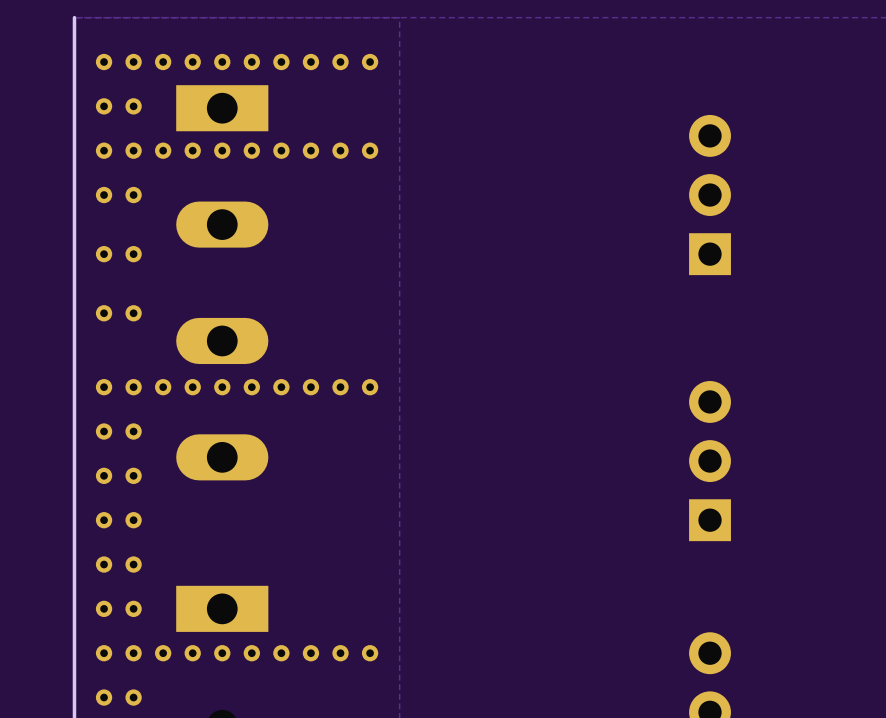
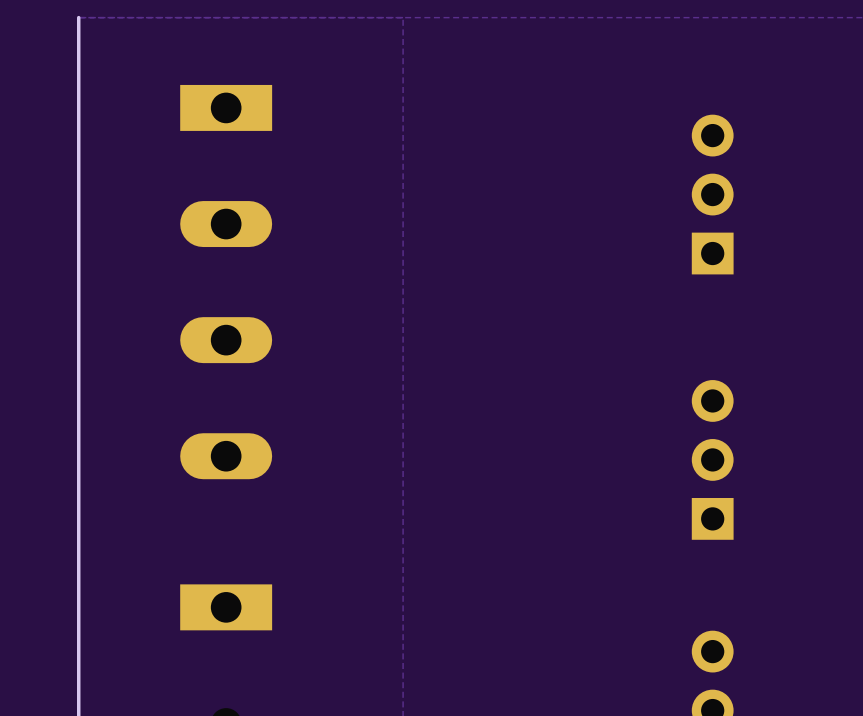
part: (104, 62) -> none
part: (133, 62) -> none
part: (163, 62) -> none
part: (192, 62) -> none
part: (222, 62) -> none
part: (251, 62) -> none
part: (281, 62) -> none
part: (310, 62) -> none
part: (340, 62) -> none
part: (370, 62) -> none
part: (104, 106) -> none
part: (133, 106) -> none
part: (104, 150) -> none
part: (133, 150) -> none
part: (163, 150) -> none
part: (192, 150) -> none
part: (222, 150) -> none
part: (251, 150) -> none
part: (281, 150) -> none
part: (310, 150) -> none
part: (340, 150) -> none
part: (370, 150) -> none
part: (104, 195) -> none
part: (133, 195) -> none
part: (104, 254) -> none
part: (133, 254) -> none
part: (104, 313) -> none
part: (133, 313) -> none
part: (104, 387) -> none
part: (133, 387) -> none
part: (163, 387) -> none
part: (192, 387) -> none
part: (222, 387) -> none
part: (251, 387) -> none
part: (281, 387) -> none
part: (310, 387) -> none
part: (340, 387) -> none
part: (370, 387) -> none
part: (104, 431) -> none
part: (133, 431) -> none
part: (104, 475) -> none
part: (133, 475) -> none
part: (104, 520) -> none
part: (133, 520) -> none
part: (104, 564) -> none
part: (133, 564) -> none
part: (104, 608) -> none
part: (133, 608) -> none
part: (104, 653) -> none
part: (133, 653) -> none
part: (163, 653) -> none
part: (192, 653) -> none
part: (222, 653) -> none
part: (251, 653) -> none
part: (281, 653) -> none
part: (310, 653) -> none
part: (340, 653) -> none
part: (370, 653) -> none
part: (104, 697) -> none
part: (133, 697) -> none

